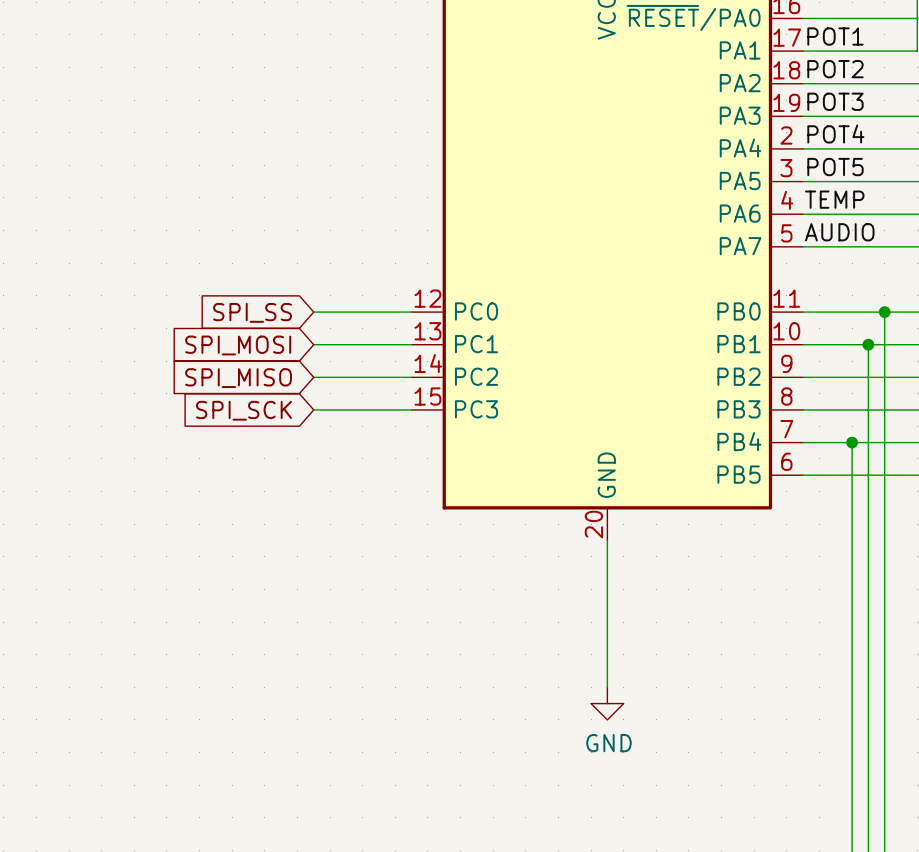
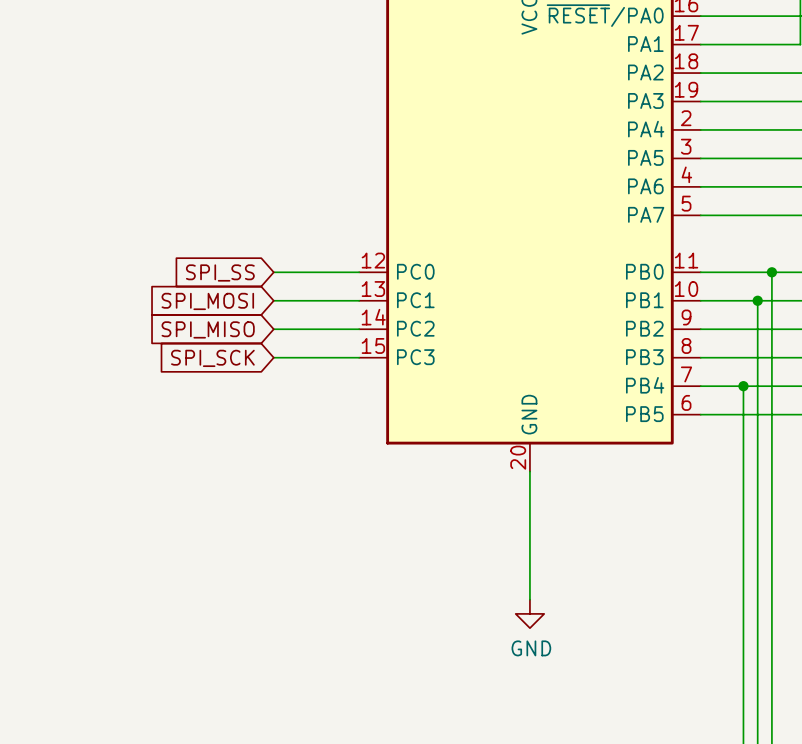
label: POT1 (835, 36) -> none
label: POT2 (835, 69) -> none
label: POT3 (835, 101) -> none
label: POT4 (835, 134) -> none
label: POT5 (835, 167) -> none
label: TEMP (834, 199) -> none
label: AUDIO (839, 232) -> none

